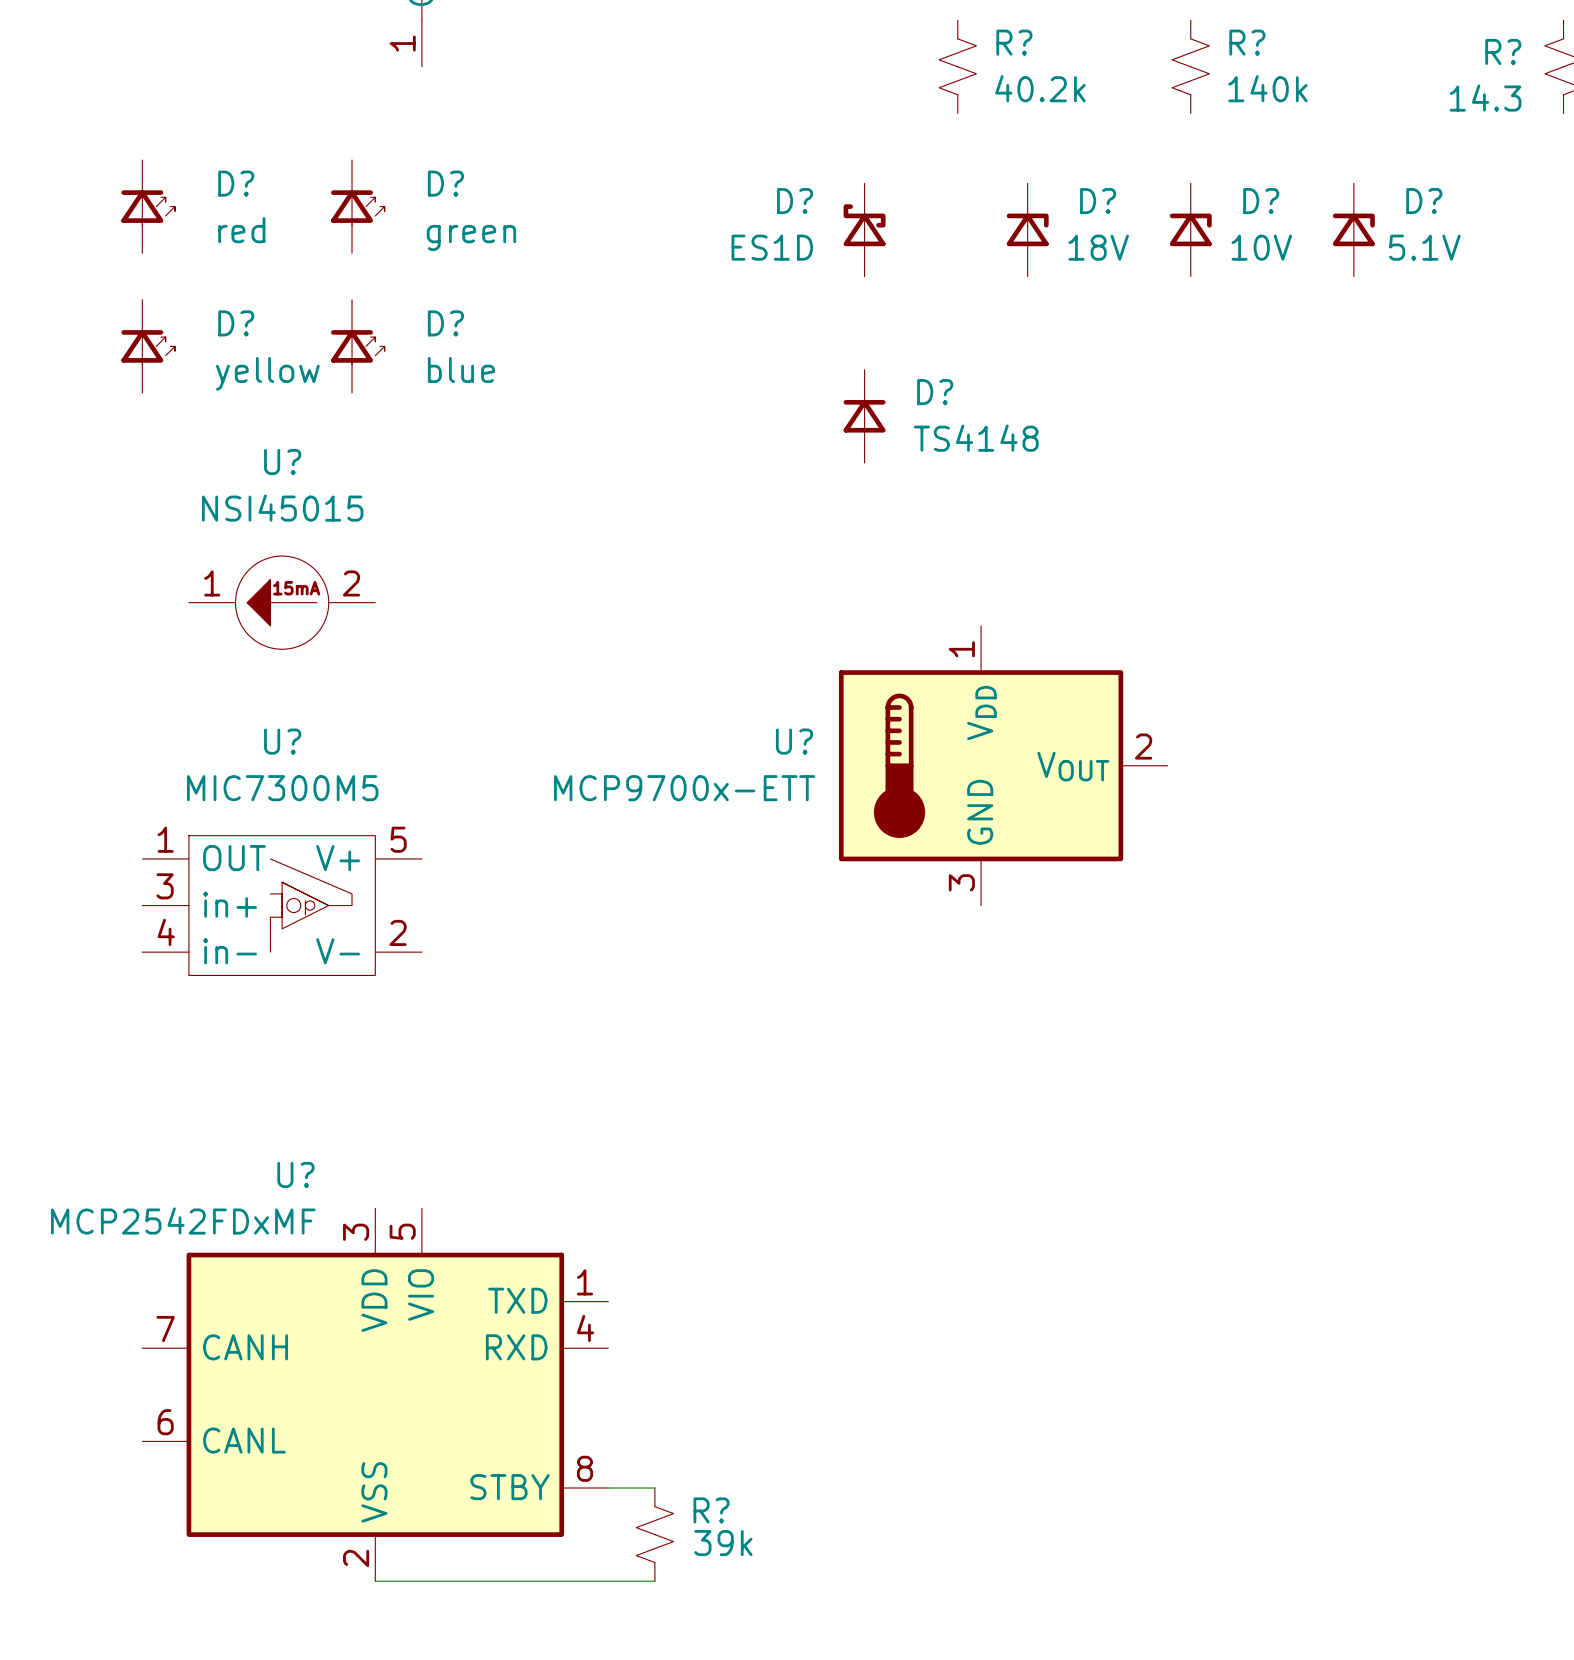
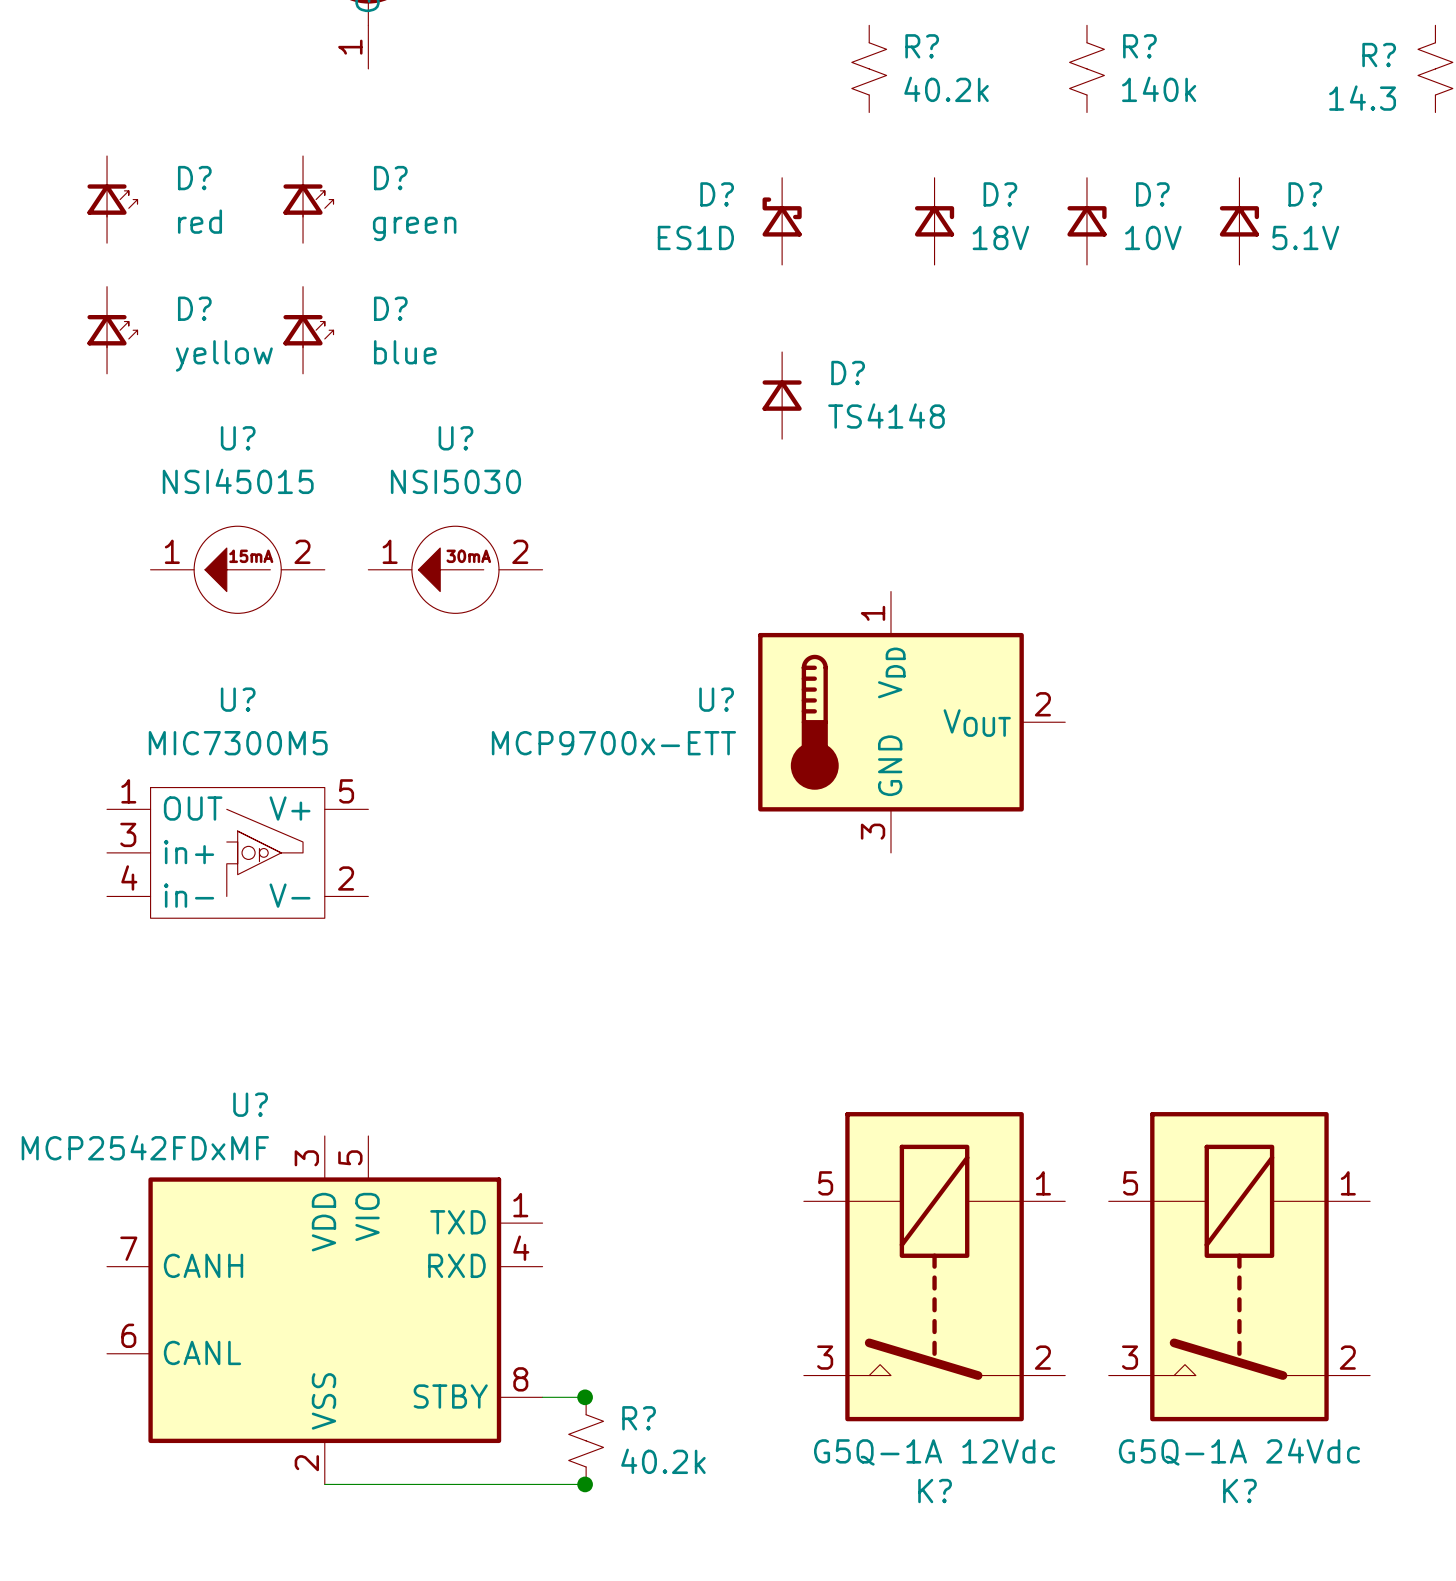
U?: none -> NSI5030 (455, 569)
K?: none -> G5Q-1A 12Vdc (934, 1266)
K?: none -> G5Q-1A 24Vdc (1239, 1266)
junction: none -> (585, 1397)
R? value: 39k (723, 1543) -> 40.2k (663, 1461)
junction: none -> (585, 1484)

